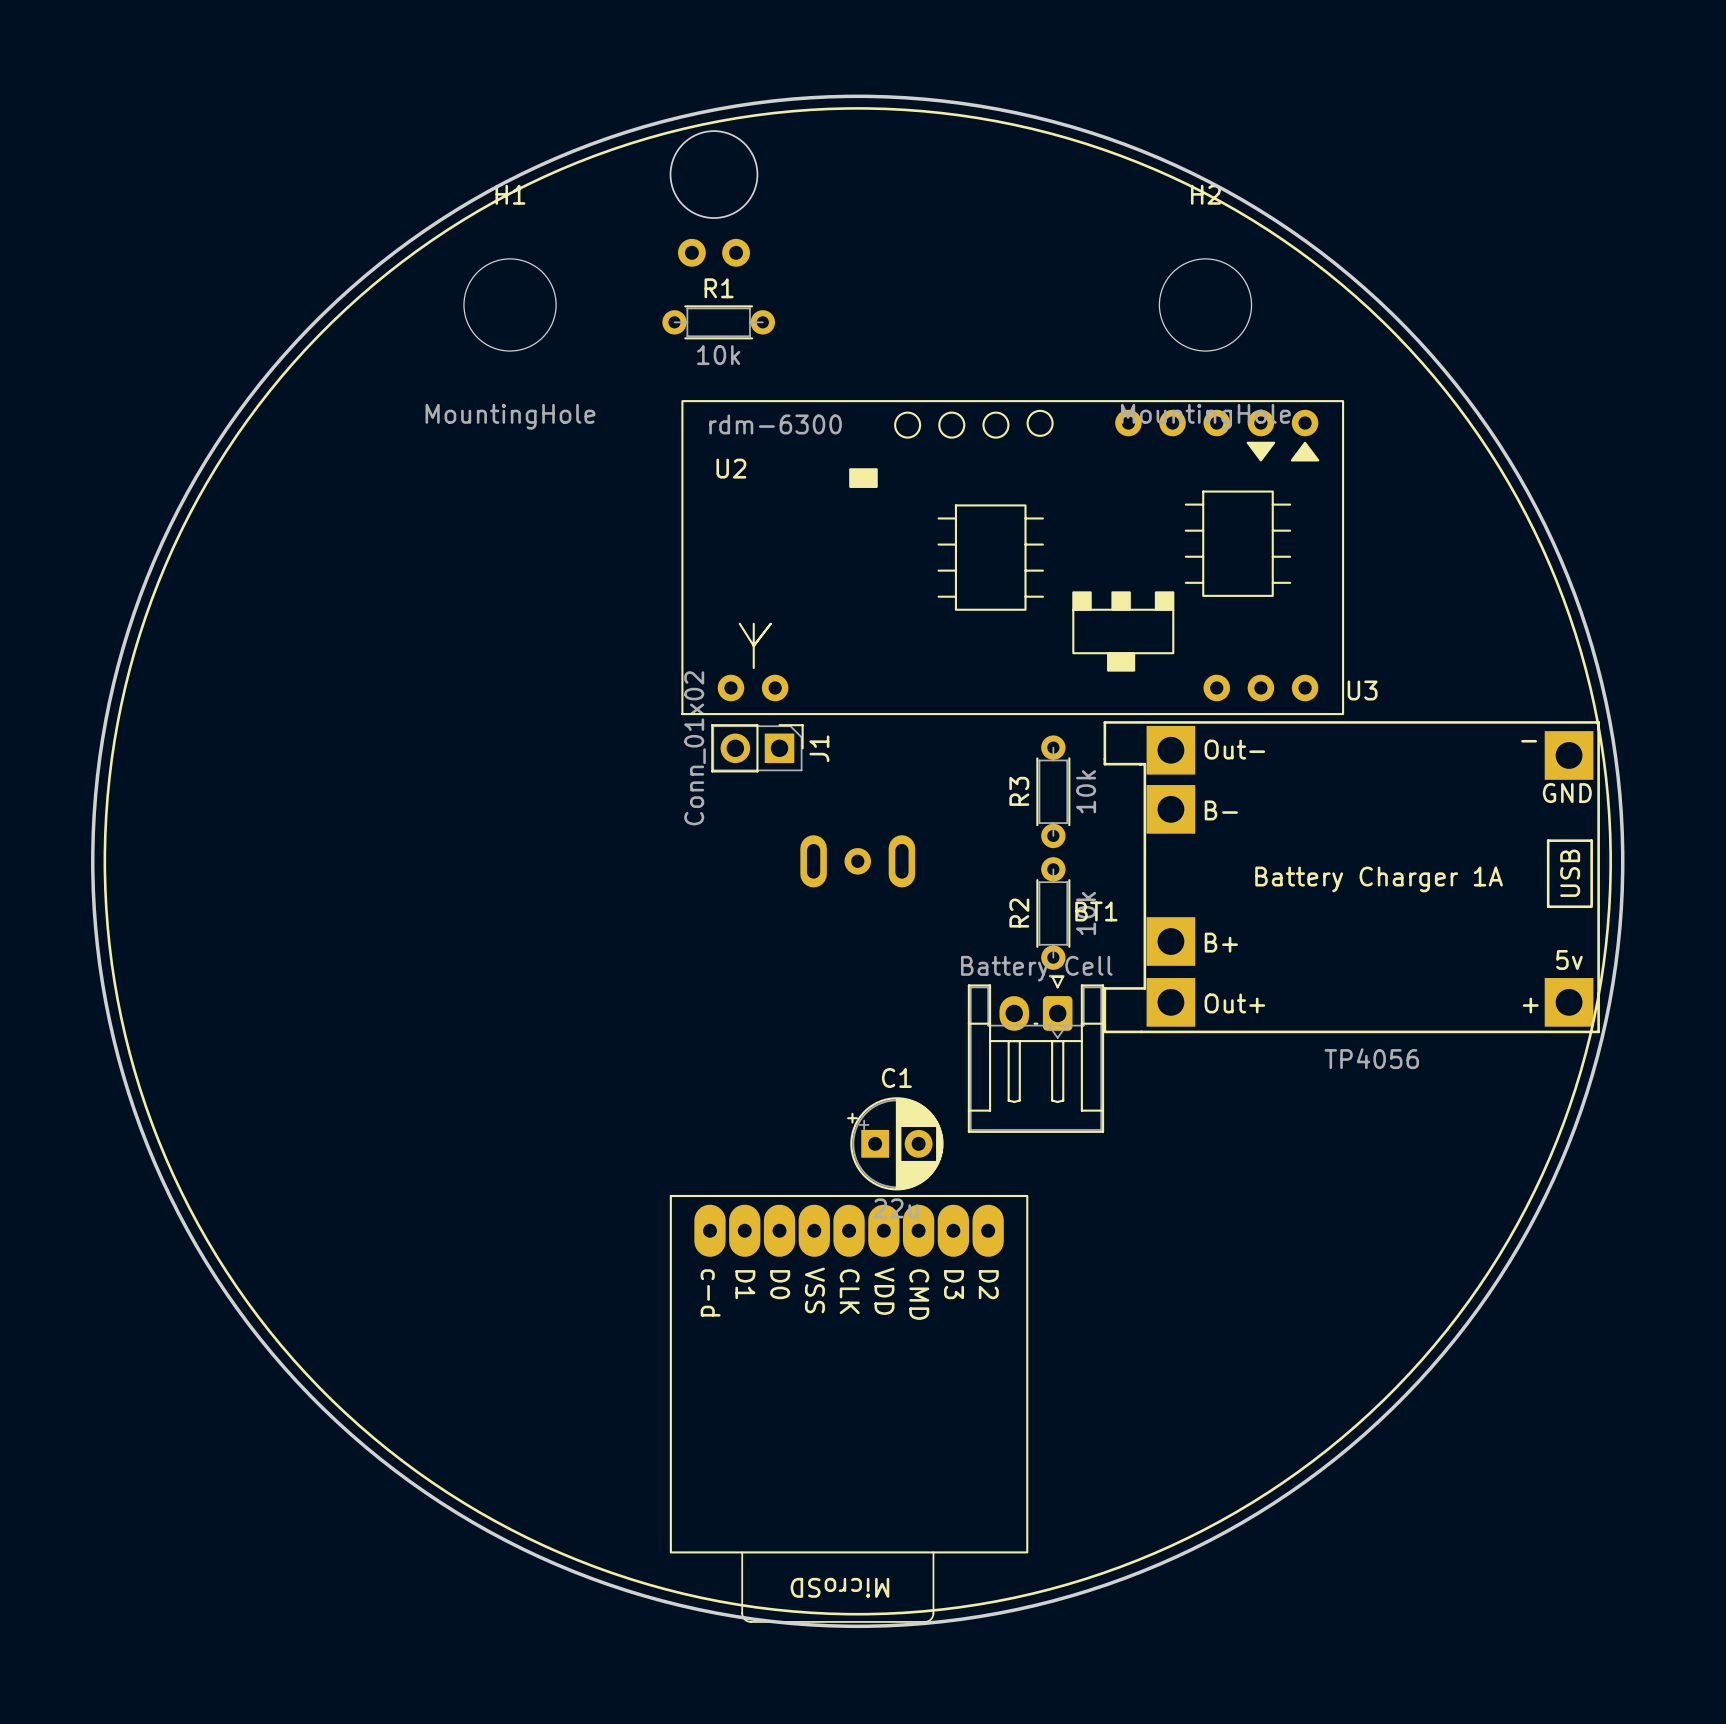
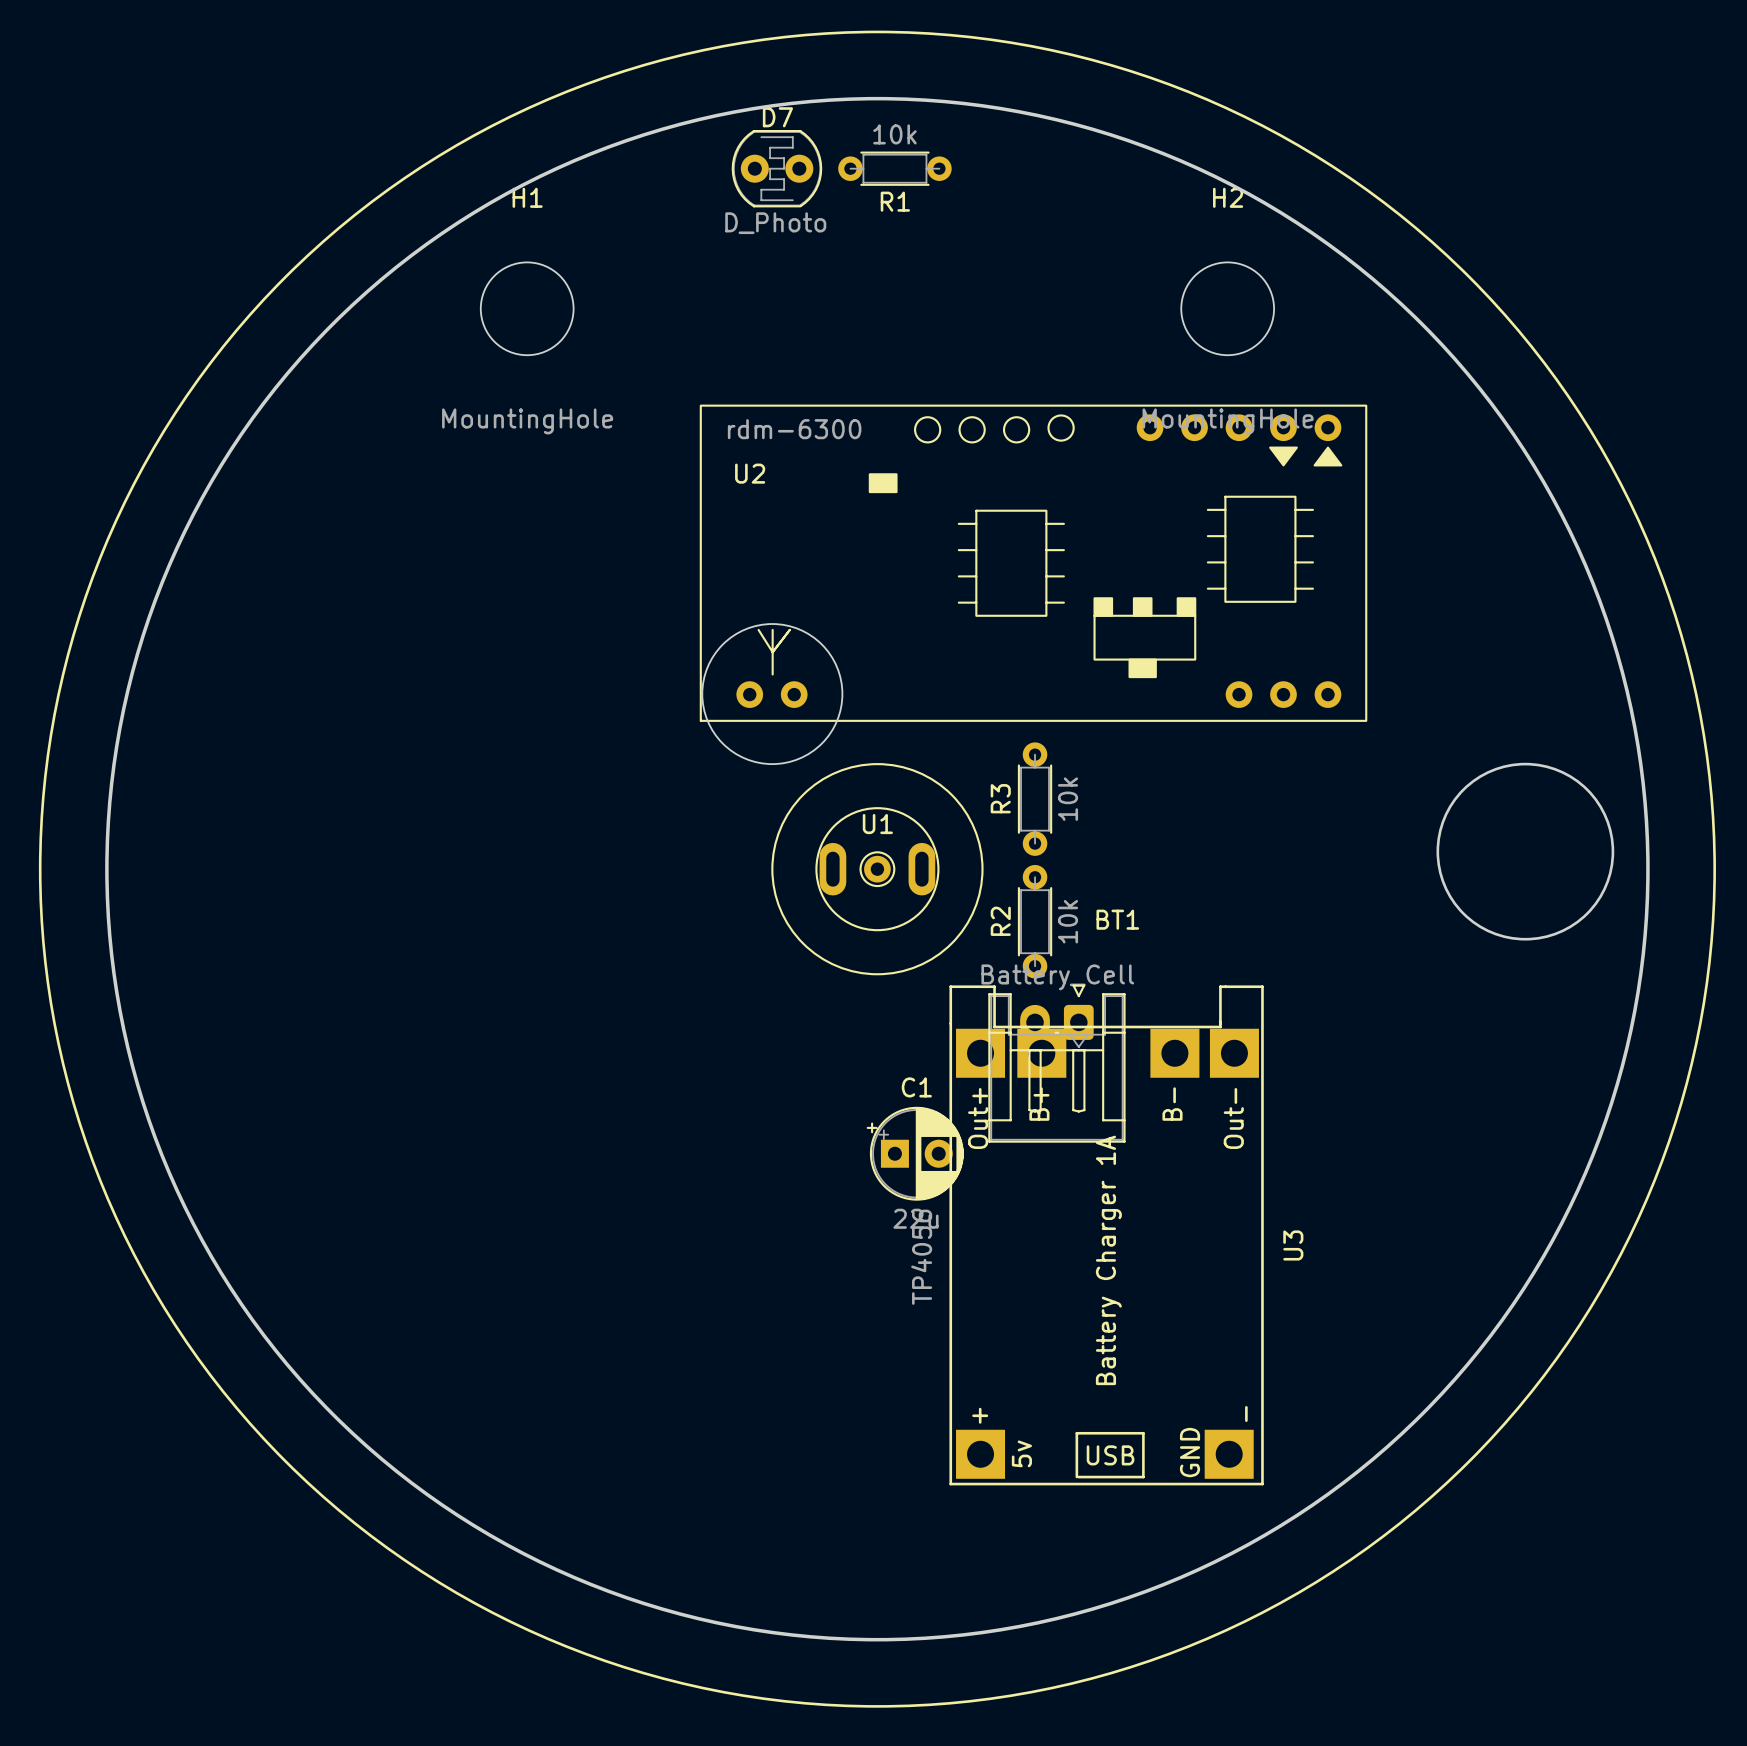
drawing shape: [103, 107, 1612, 1616] -> [38, 30, 1716, 1708]
round board edge: [669, 130, 759, 219] -> none
D7 side: bottom (713, 252) -> top (776, 168)
R1 name position: R1 (719, 288) -> R1 (895, 201)
R1 position: (718, 322) -> (894, 168)
R1 value position: 10k (718, 355) -> 10k (894, 134)
round board edge: none -> [701, 623, 844, 765]
J1: Conn_01x02 (757, 748) -> none
round board edge: none -> [1436, 762, 1615, 941]
R3 position: (1053, 791) -> (1035, 799)
U1 side: bottom (857, 861) -> top (877, 869)
U3 rotation: 0° (1351, 877) -> 90° clockwise (1106, 1235)
U3 position: (1351, 877) -> (1106, 1235)
R2 position: (1053, 913) -> (1035, 921)
part: (849, 1408) -> none

